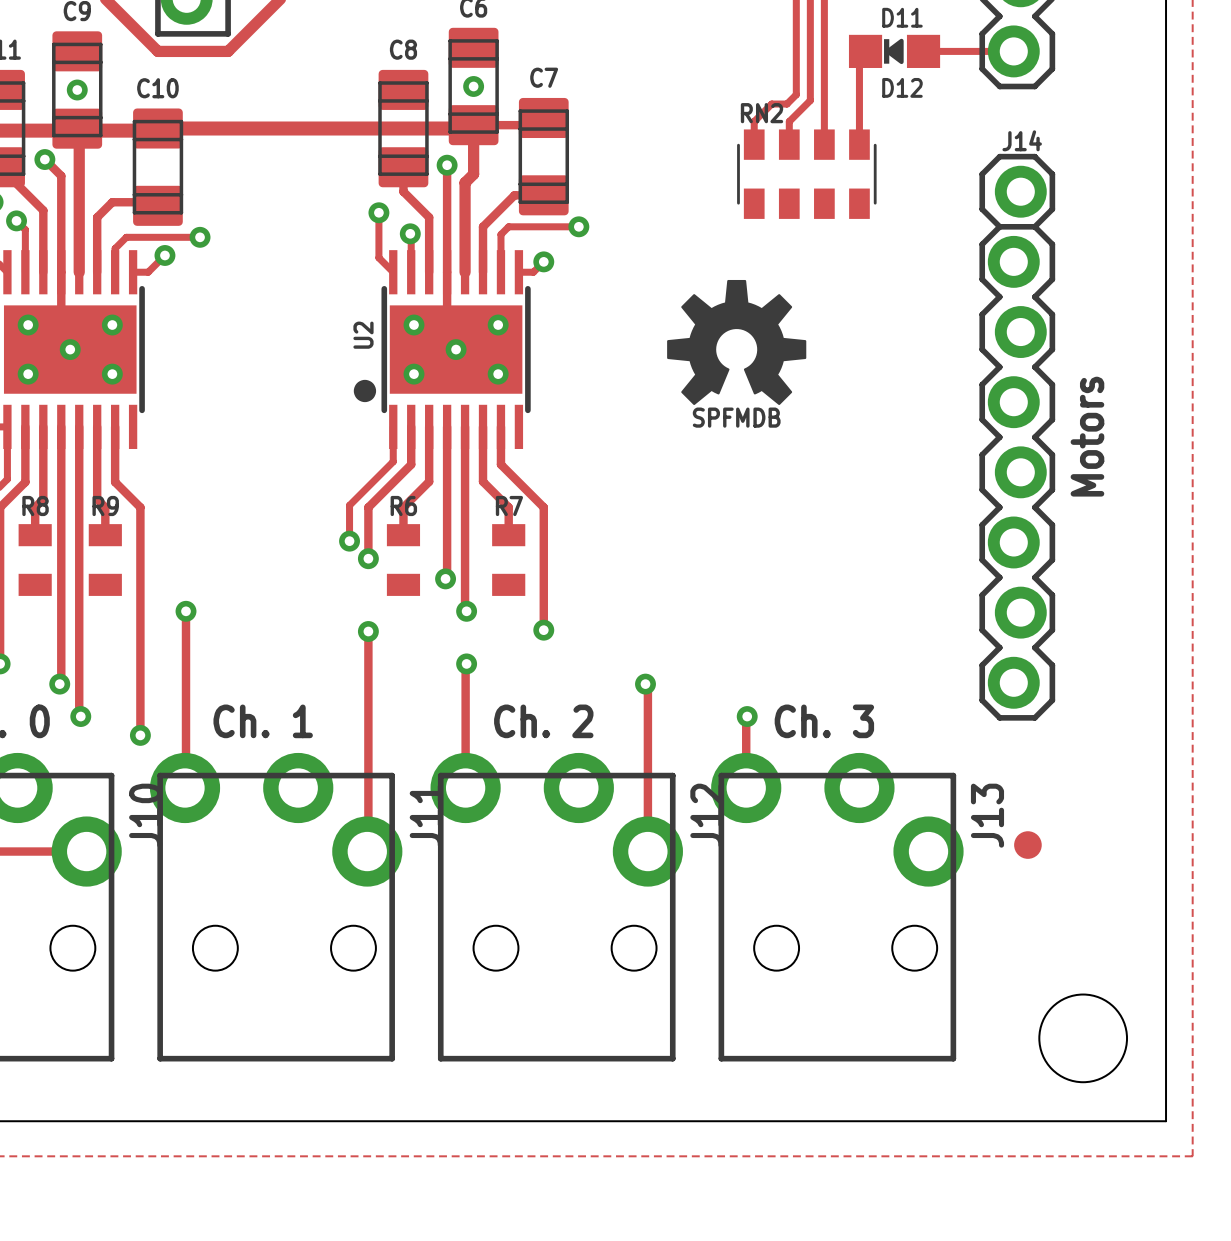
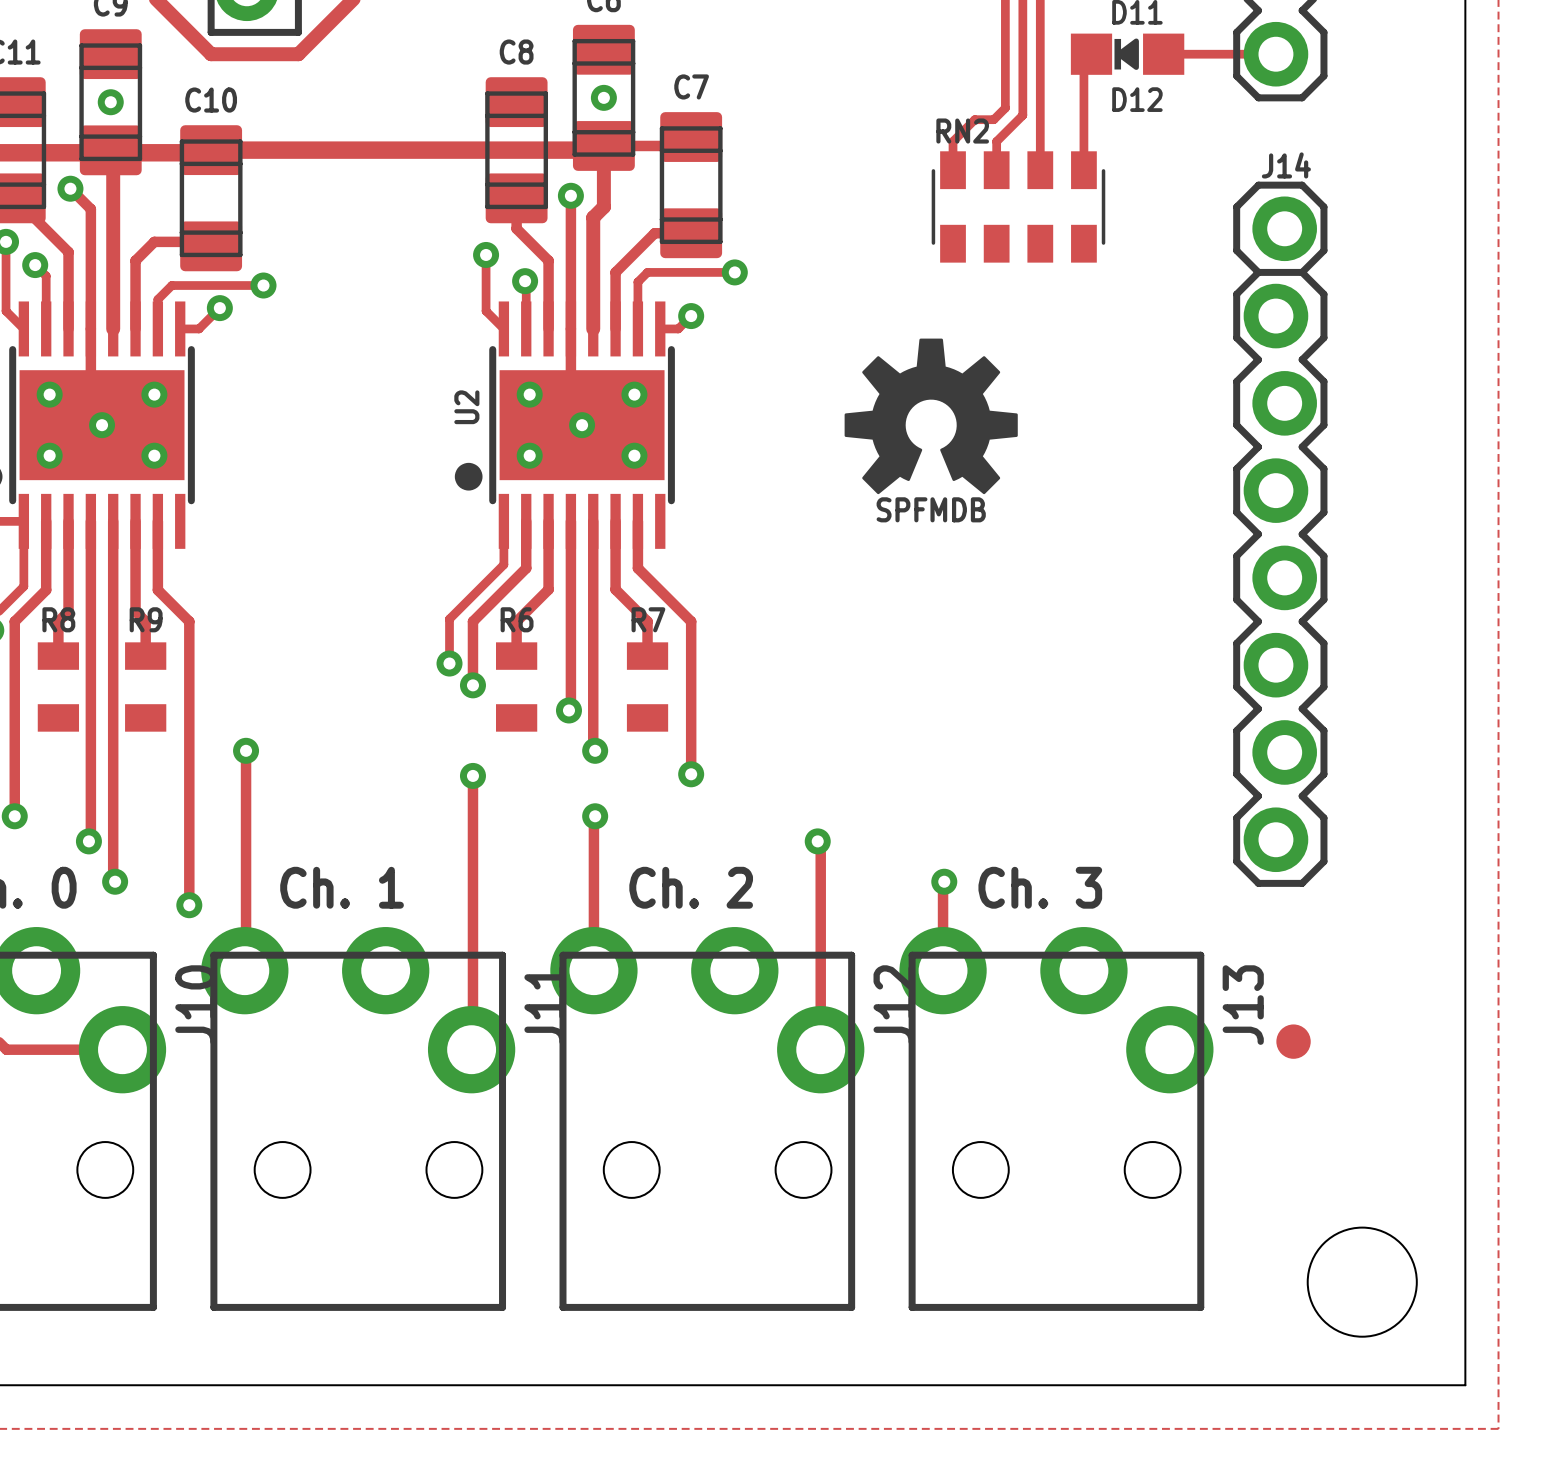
text: Motors (1087, 436) -> none

